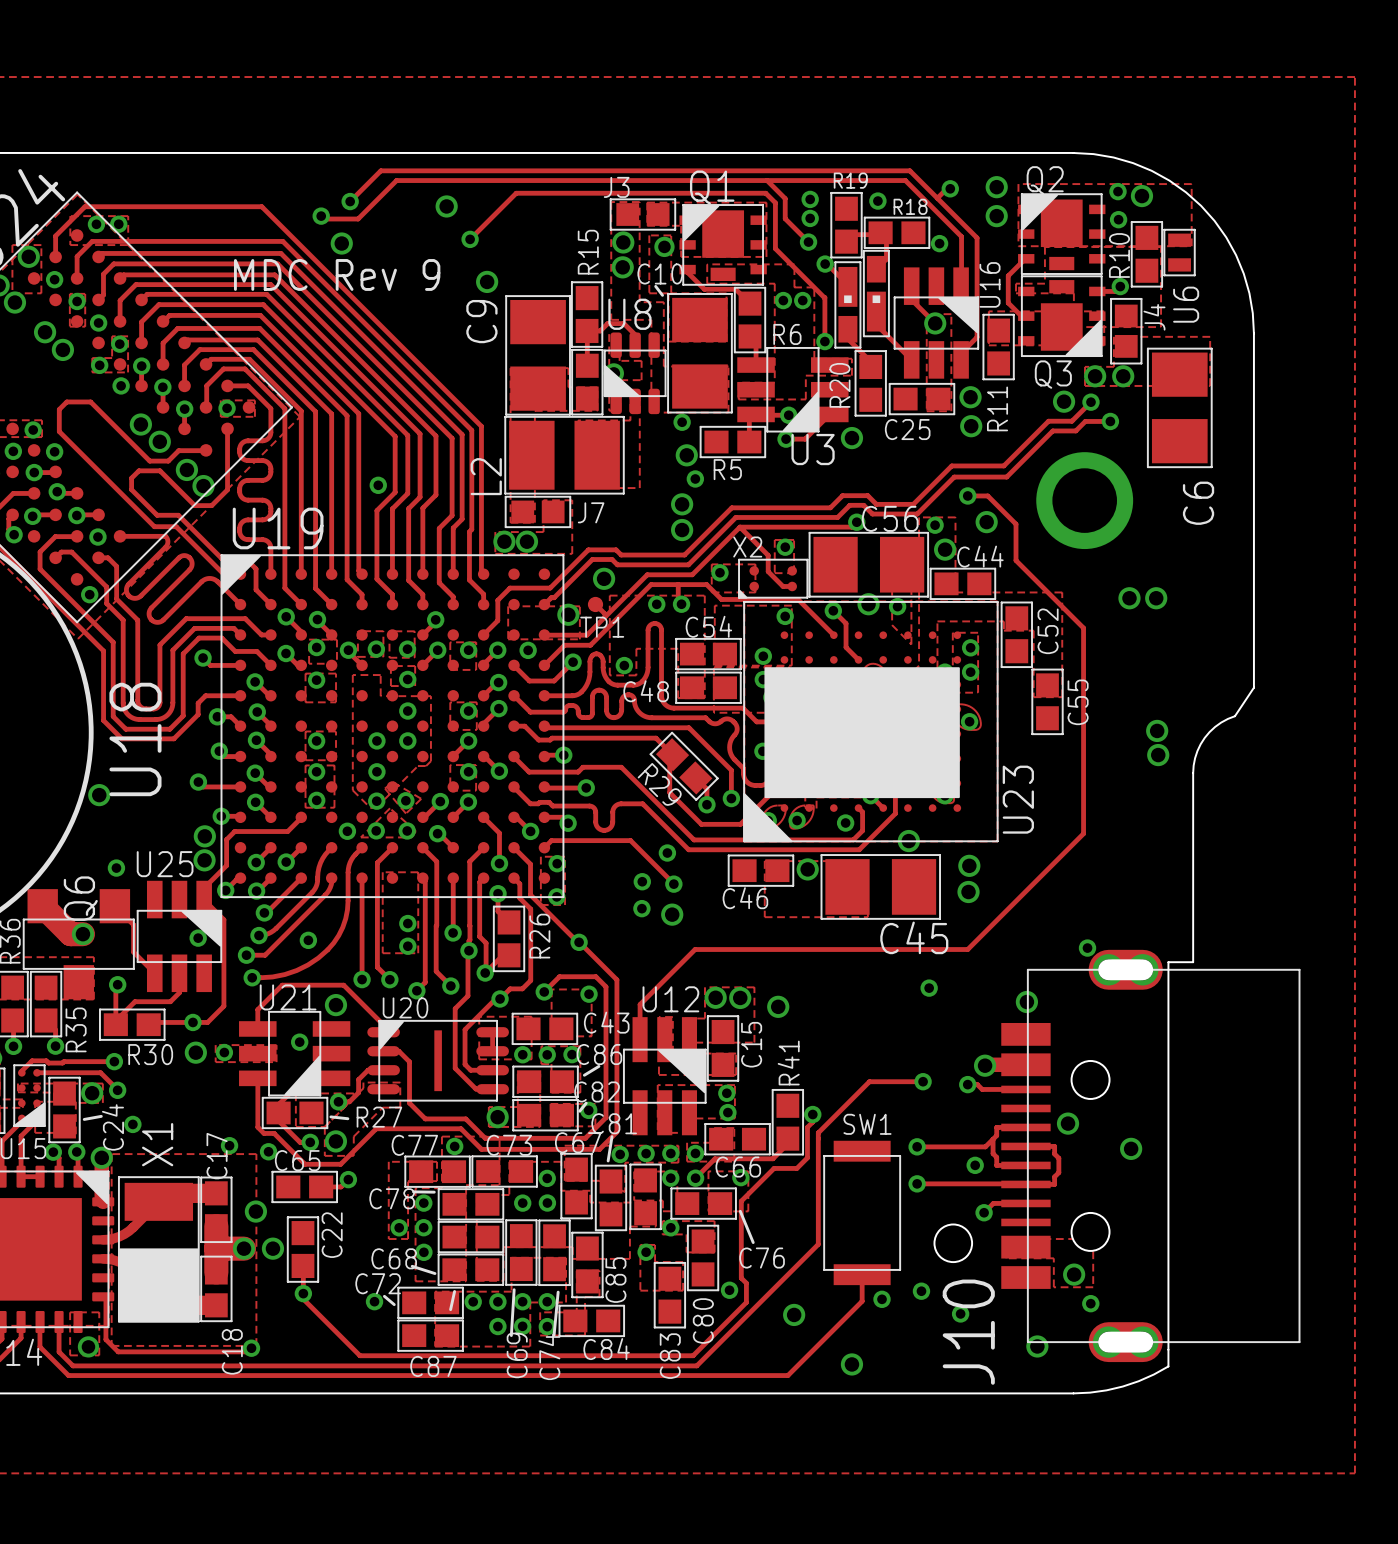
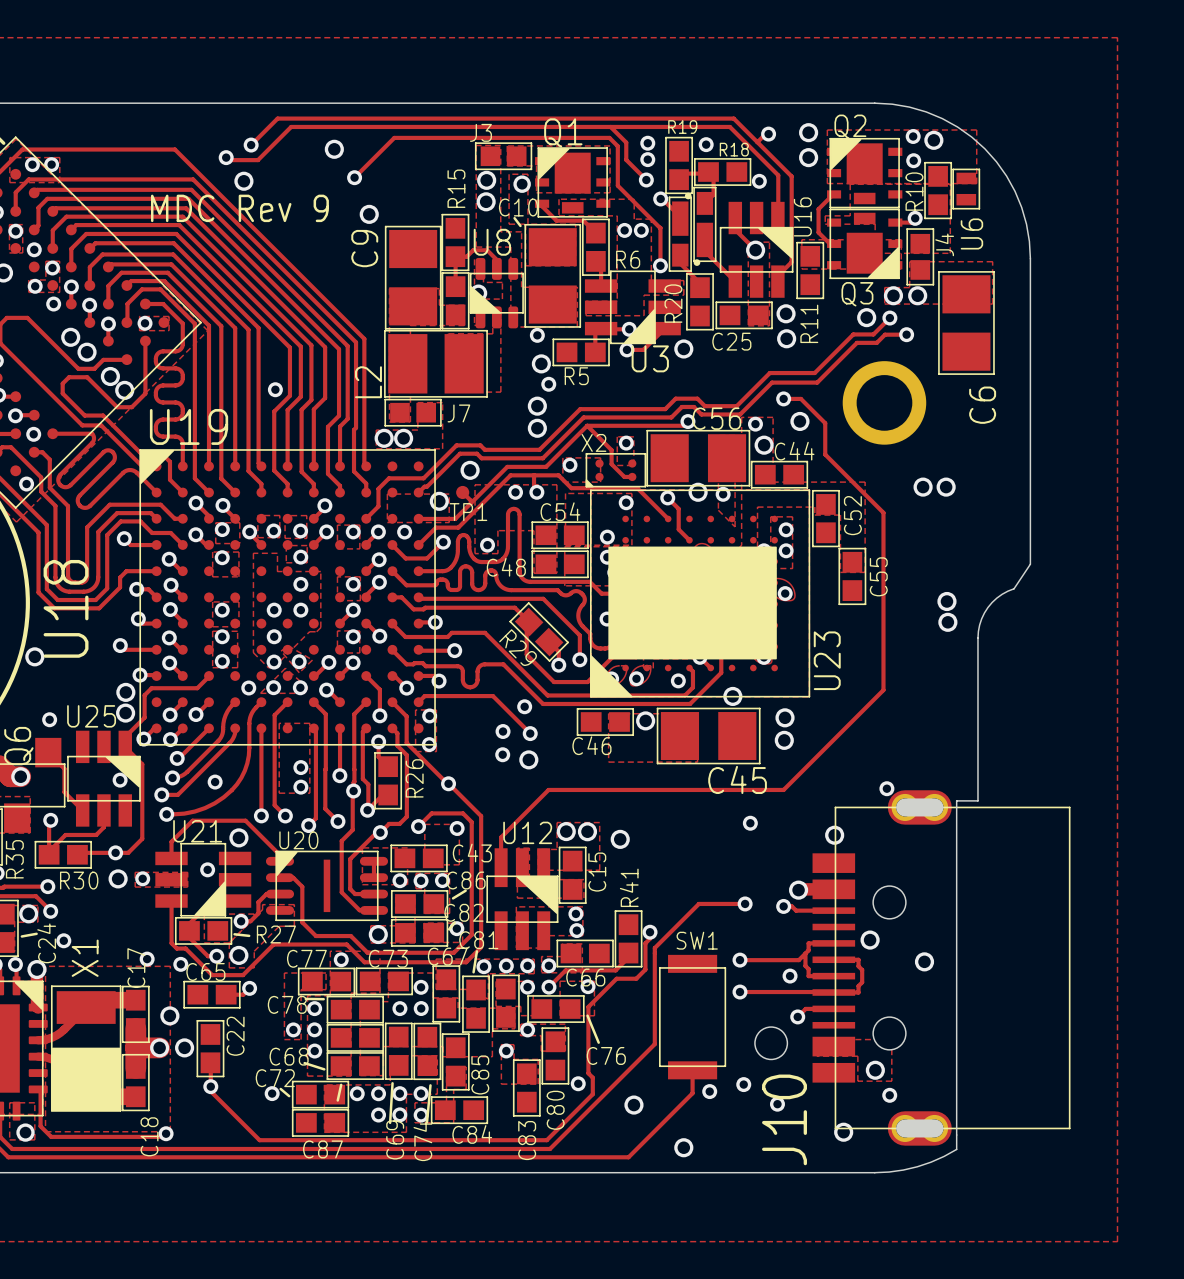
part footprint: [862, 249, 890, 338] -> [684, 186, 717, 263]
part footprint: [834, 261, 862, 349] -> [668, 196, 701, 272]

